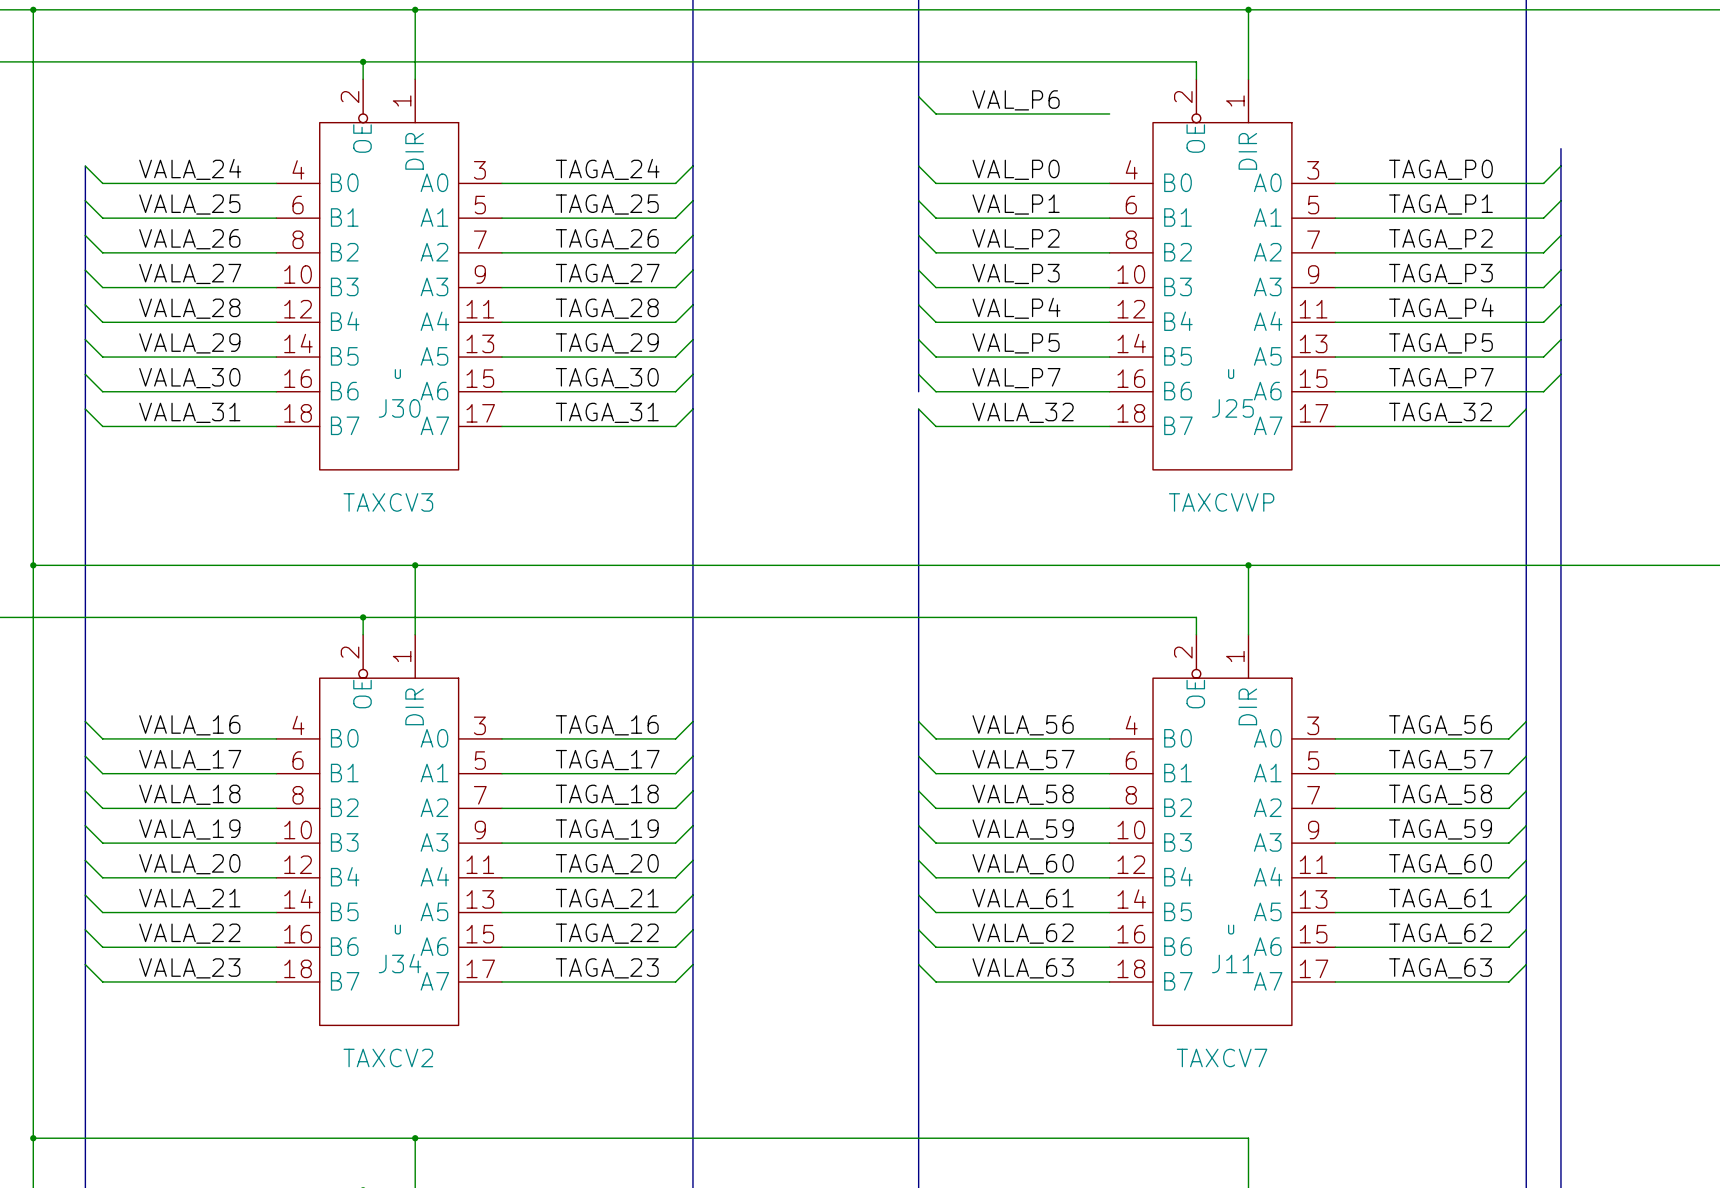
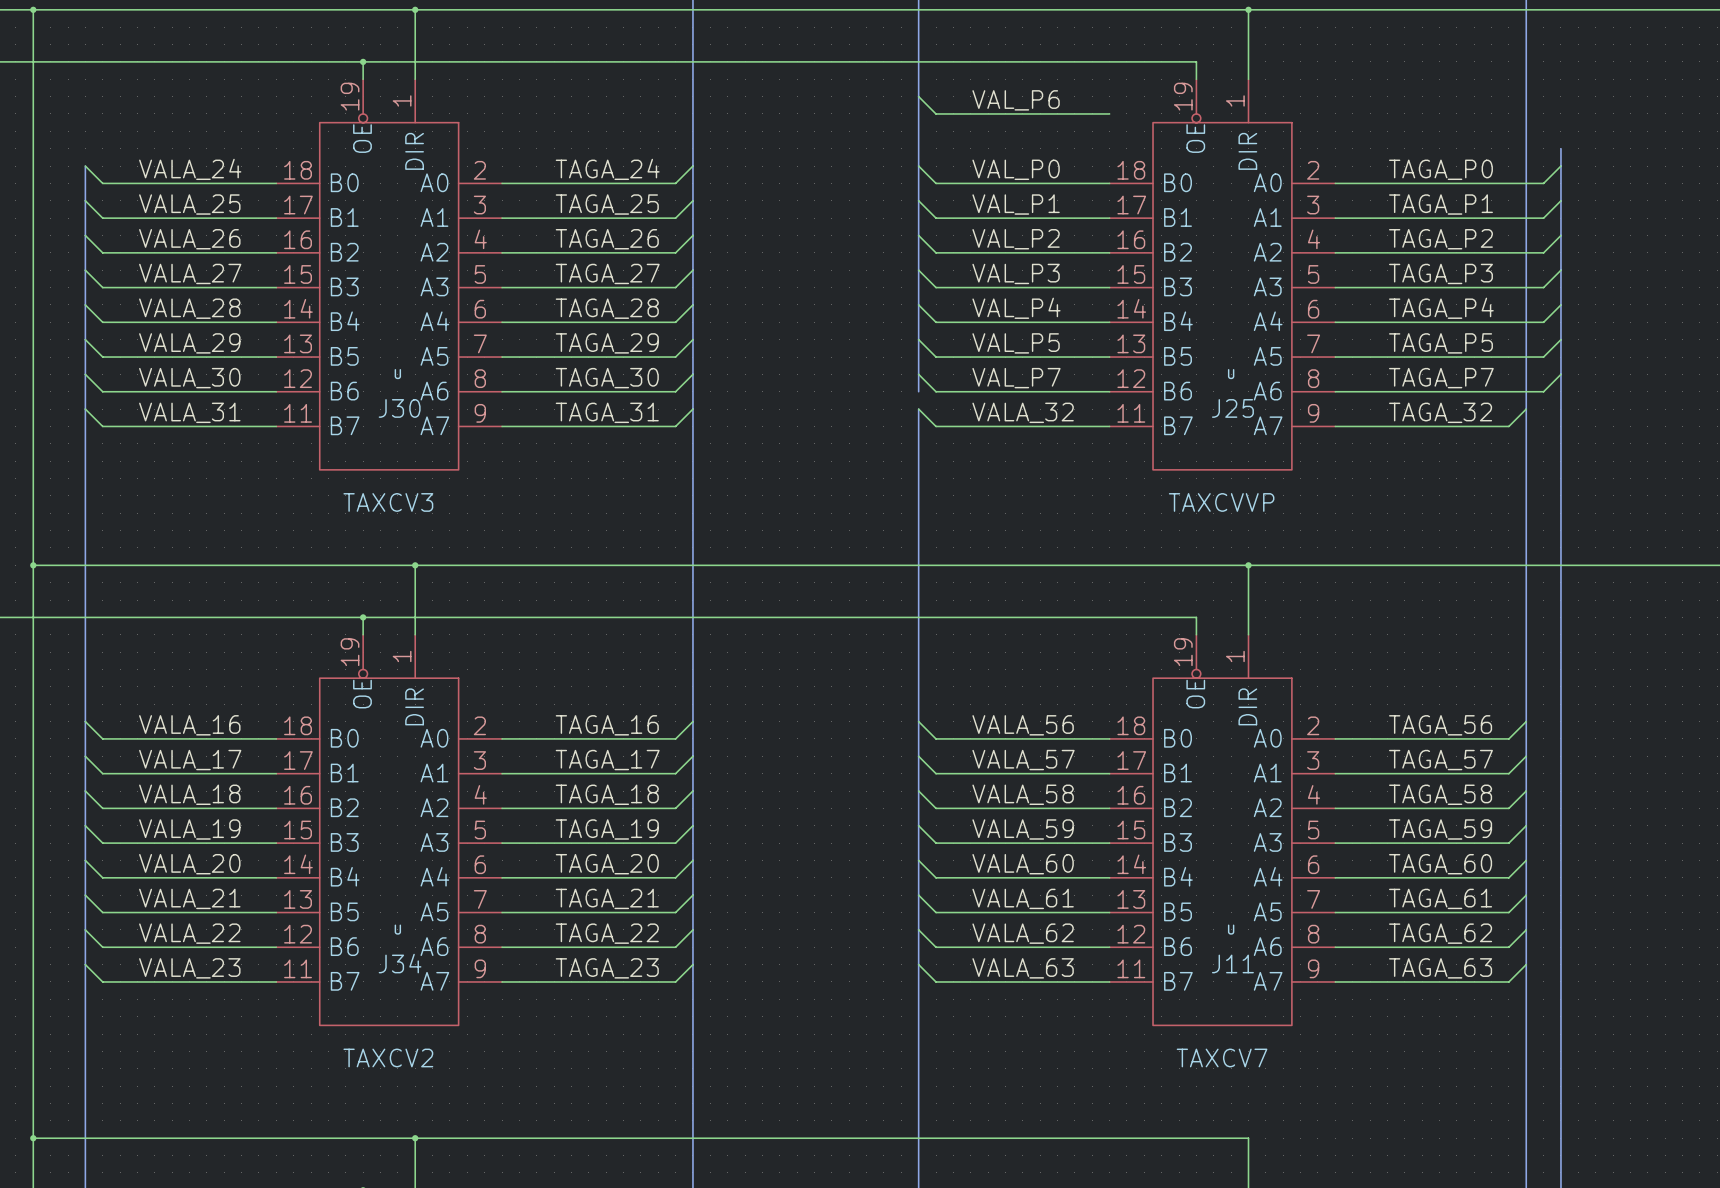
U symbol: [276, 79, 503, 470] -> [276, 79, 503, 470]
U symbol: [1109, 79, 1336, 470] -> [1109, 79, 1336, 470]
U symbol: [276, 634, 503, 1026] -> [276, 634, 503, 1026]
U symbol: [1109, 634, 1336, 1026] -> [1109, 634, 1336, 1026]

